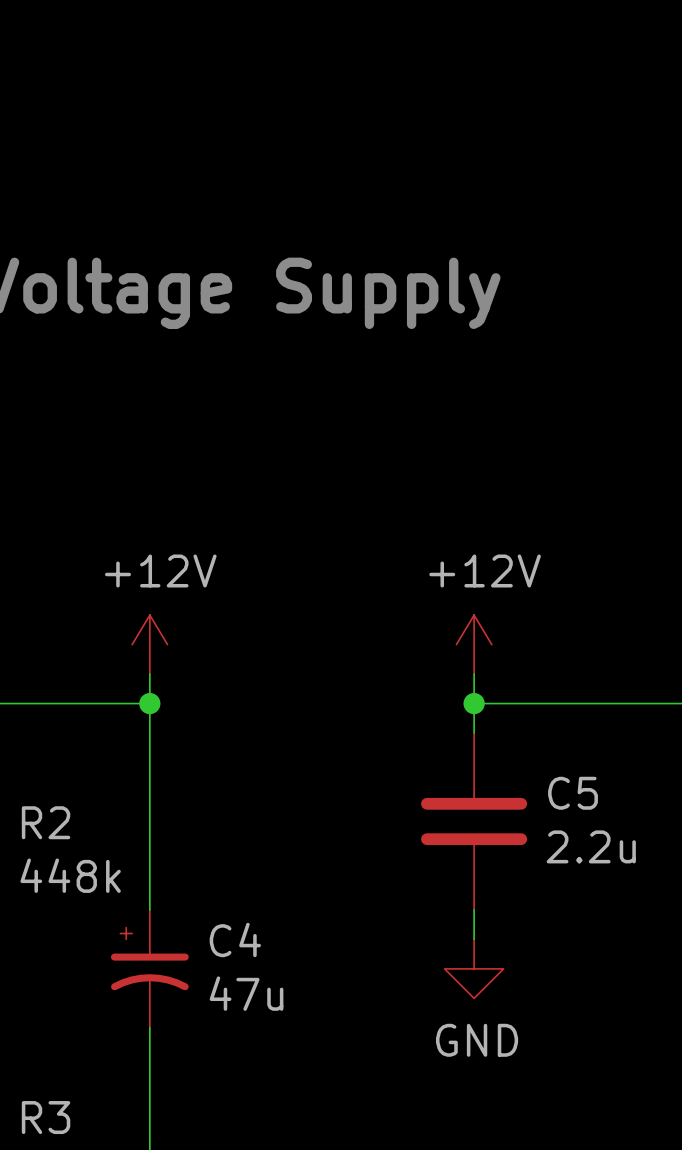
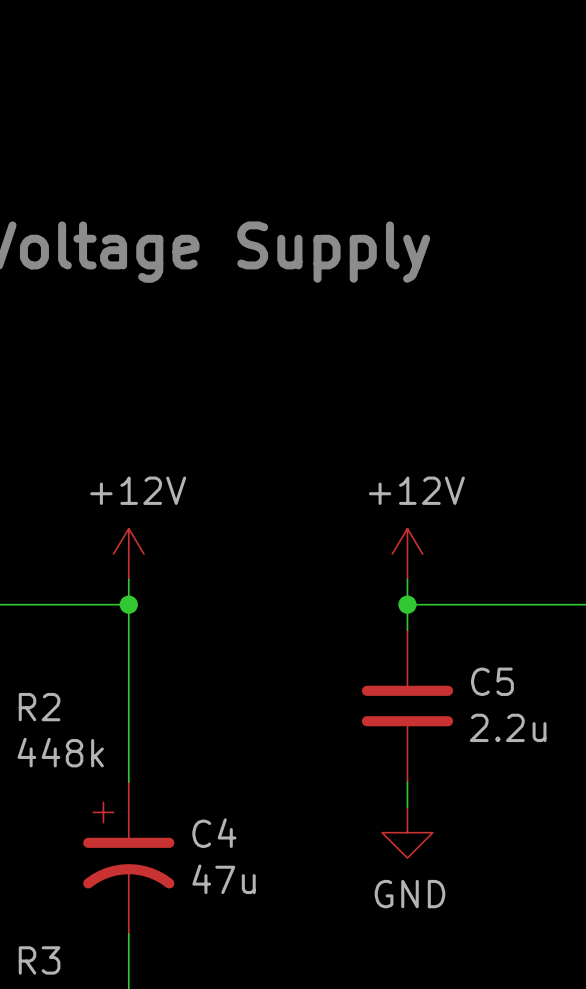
C4 symbol: [110, 909, 189, 1028] -> [83, 782, 175, 935]

